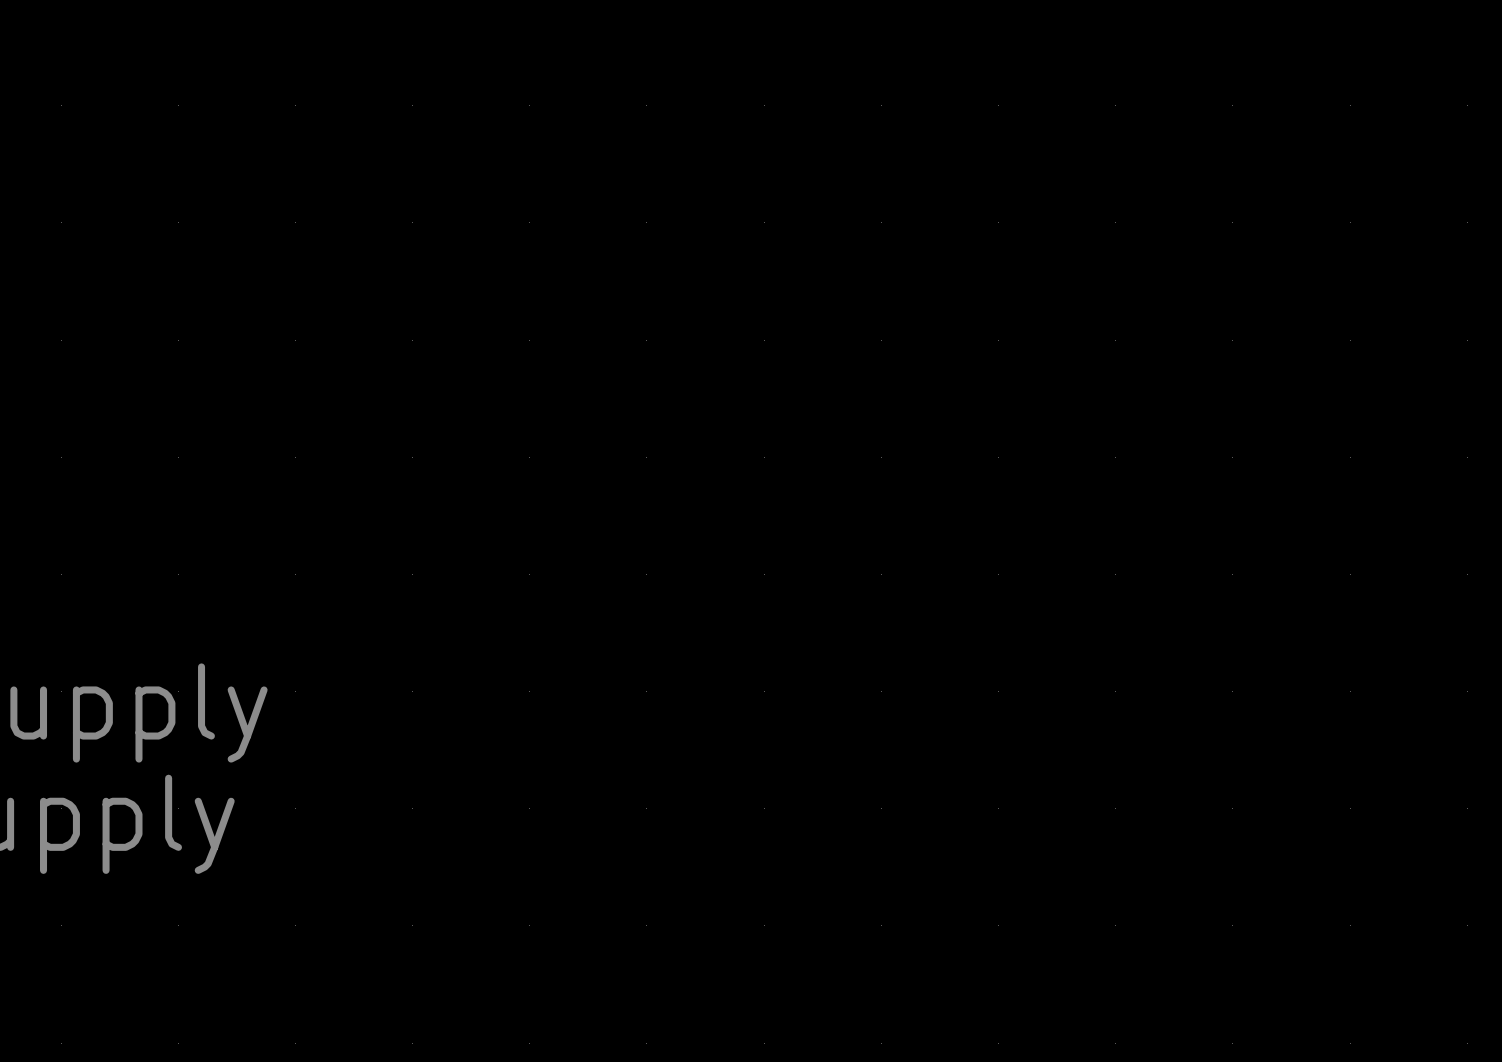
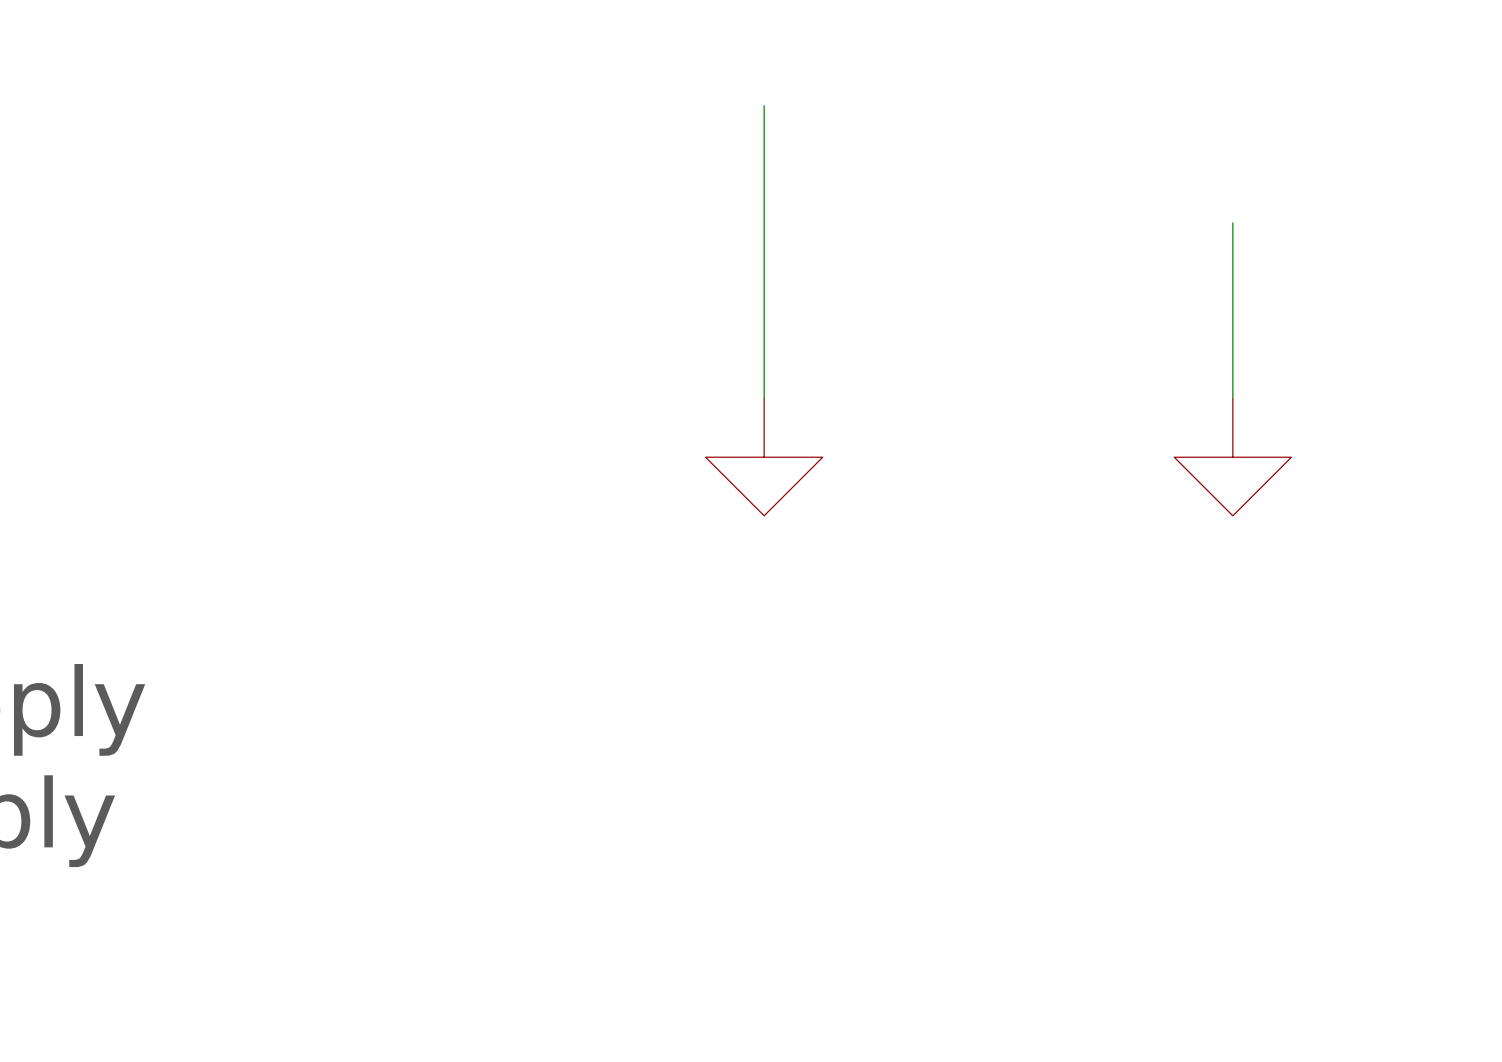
wire: none -> (764, 105) (764, 398)
wire: none -> (1232, 222) (1232, 398)
power symbol: none -> (764, 457)
power symbol: none -> (1232, 457)

